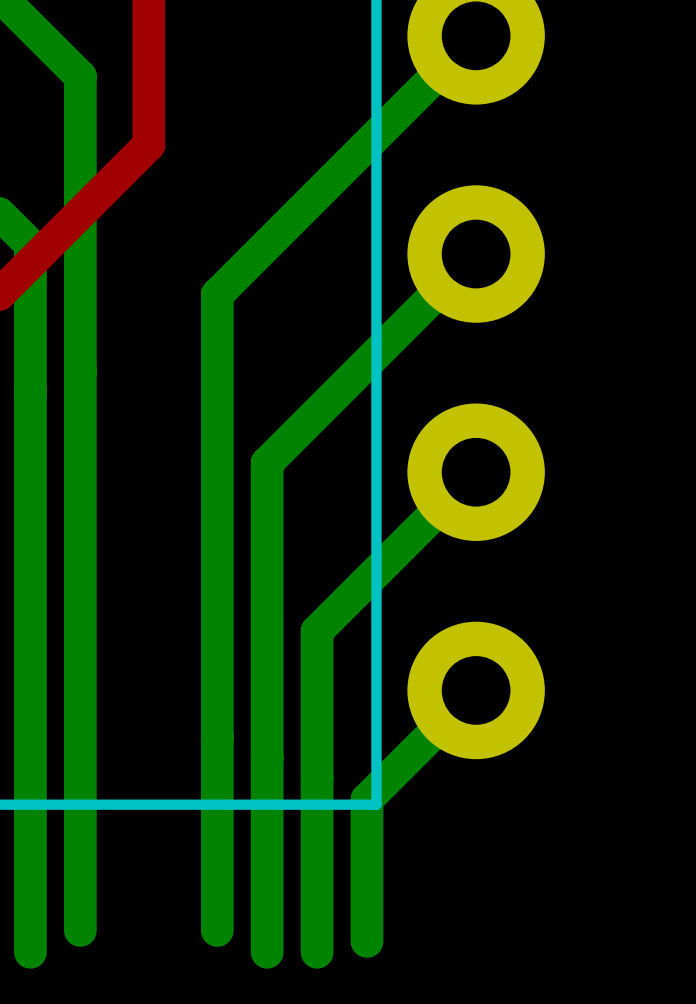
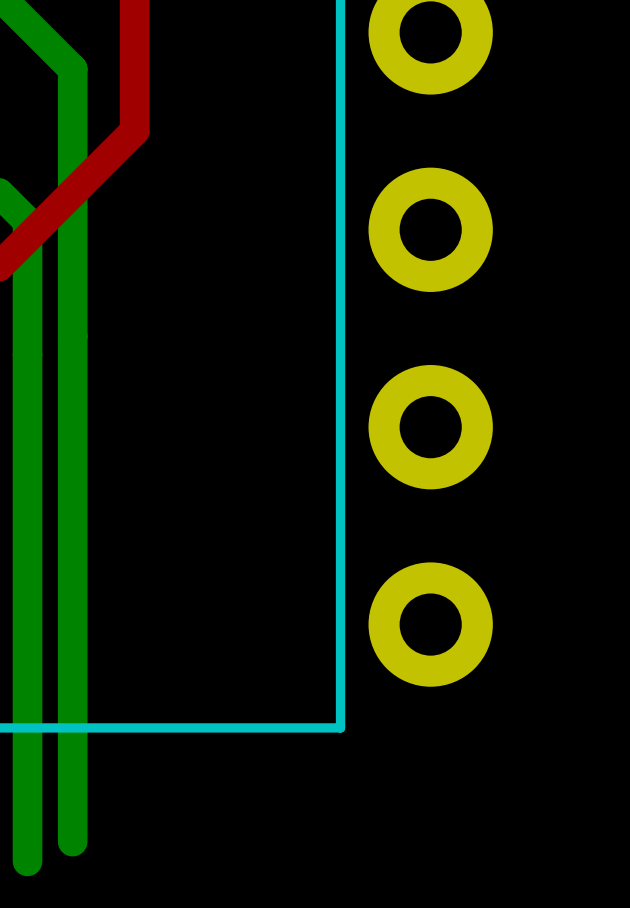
bottom track: (476, 35) (217, 294) (217, 930) -> none
bottom track: (476, 254) (267, 462) (267, 952) -> none
bottom track: (476, 472) (317, 631) (317, 952) -> none
bottom track: (476, 690) (367, 799) (367, 941) -> none

